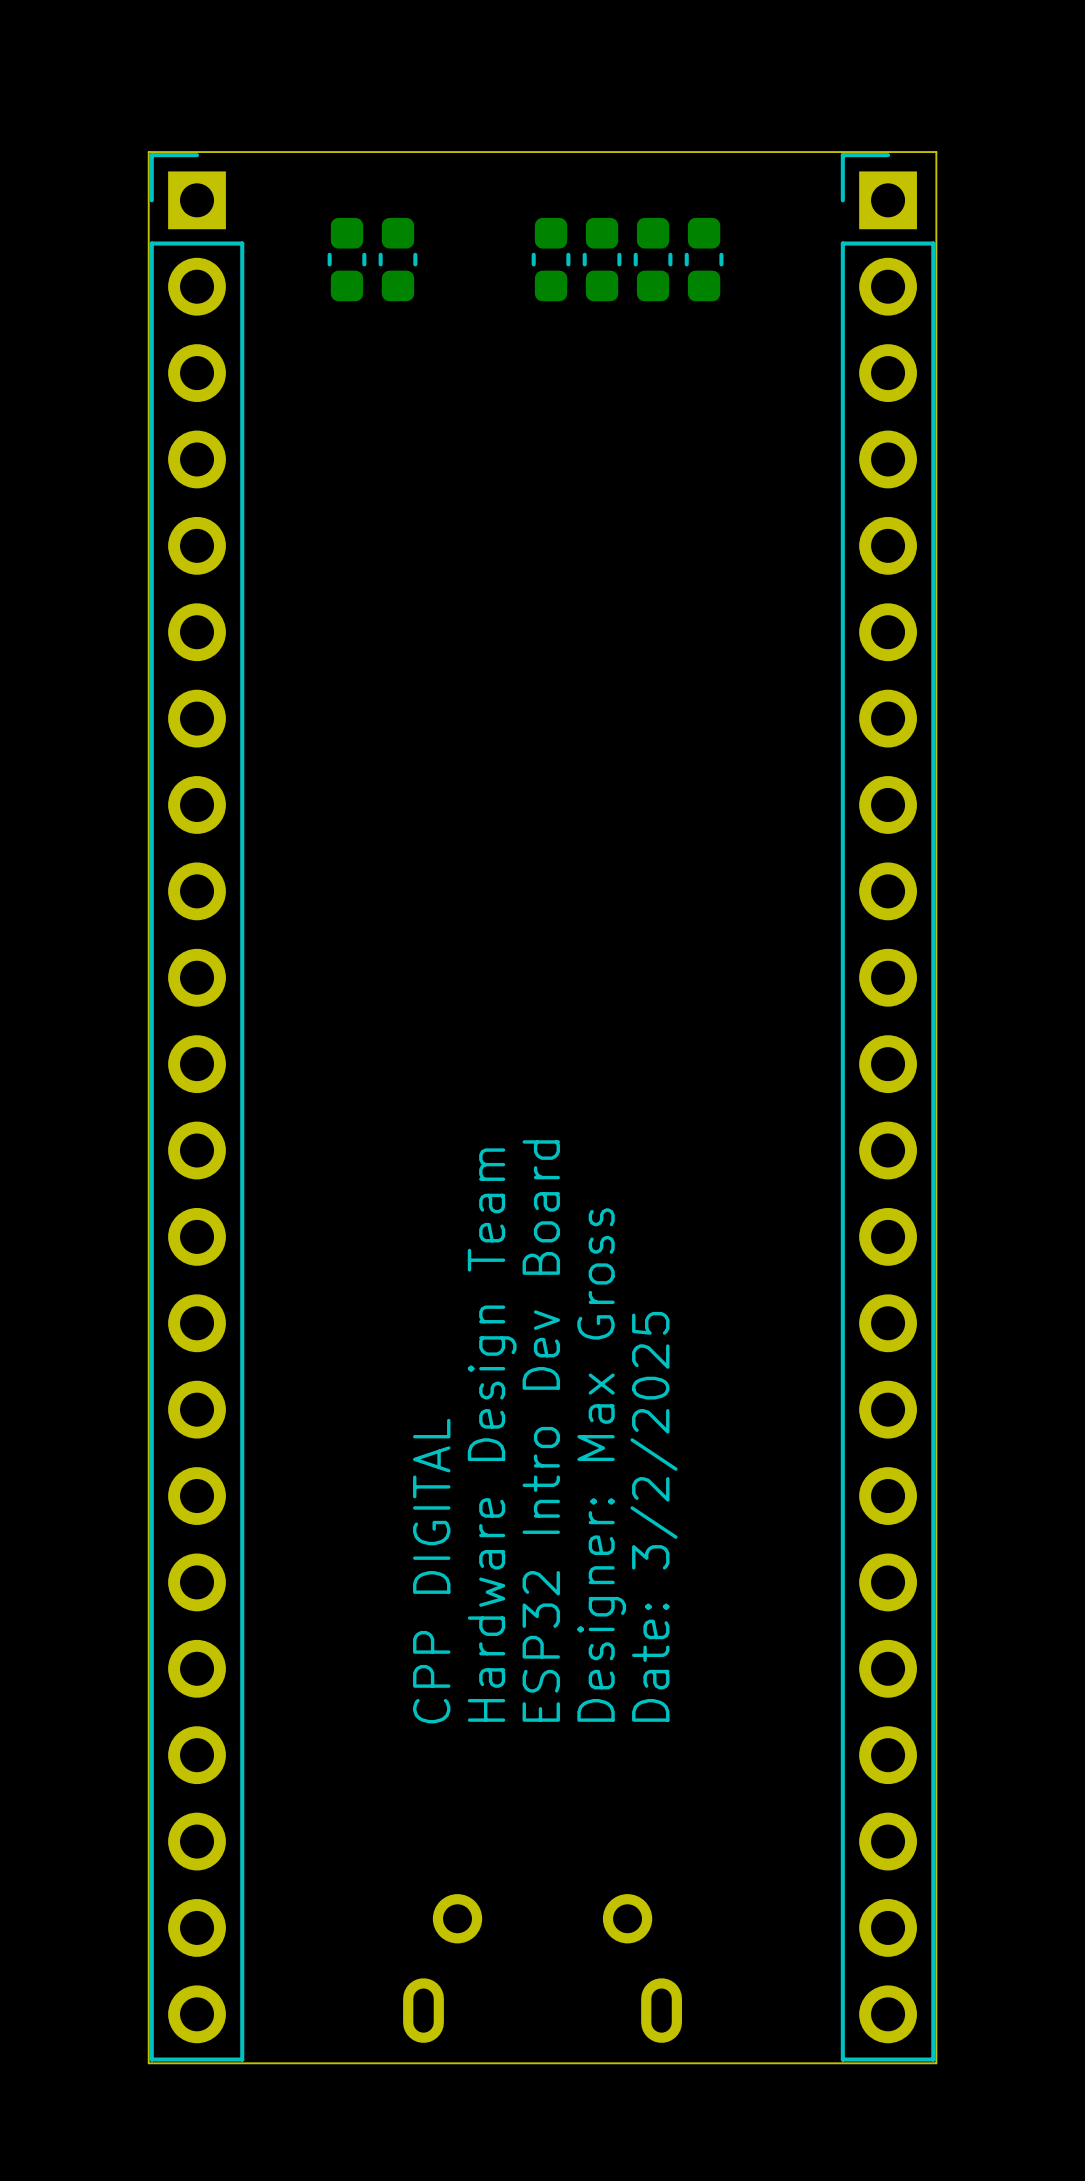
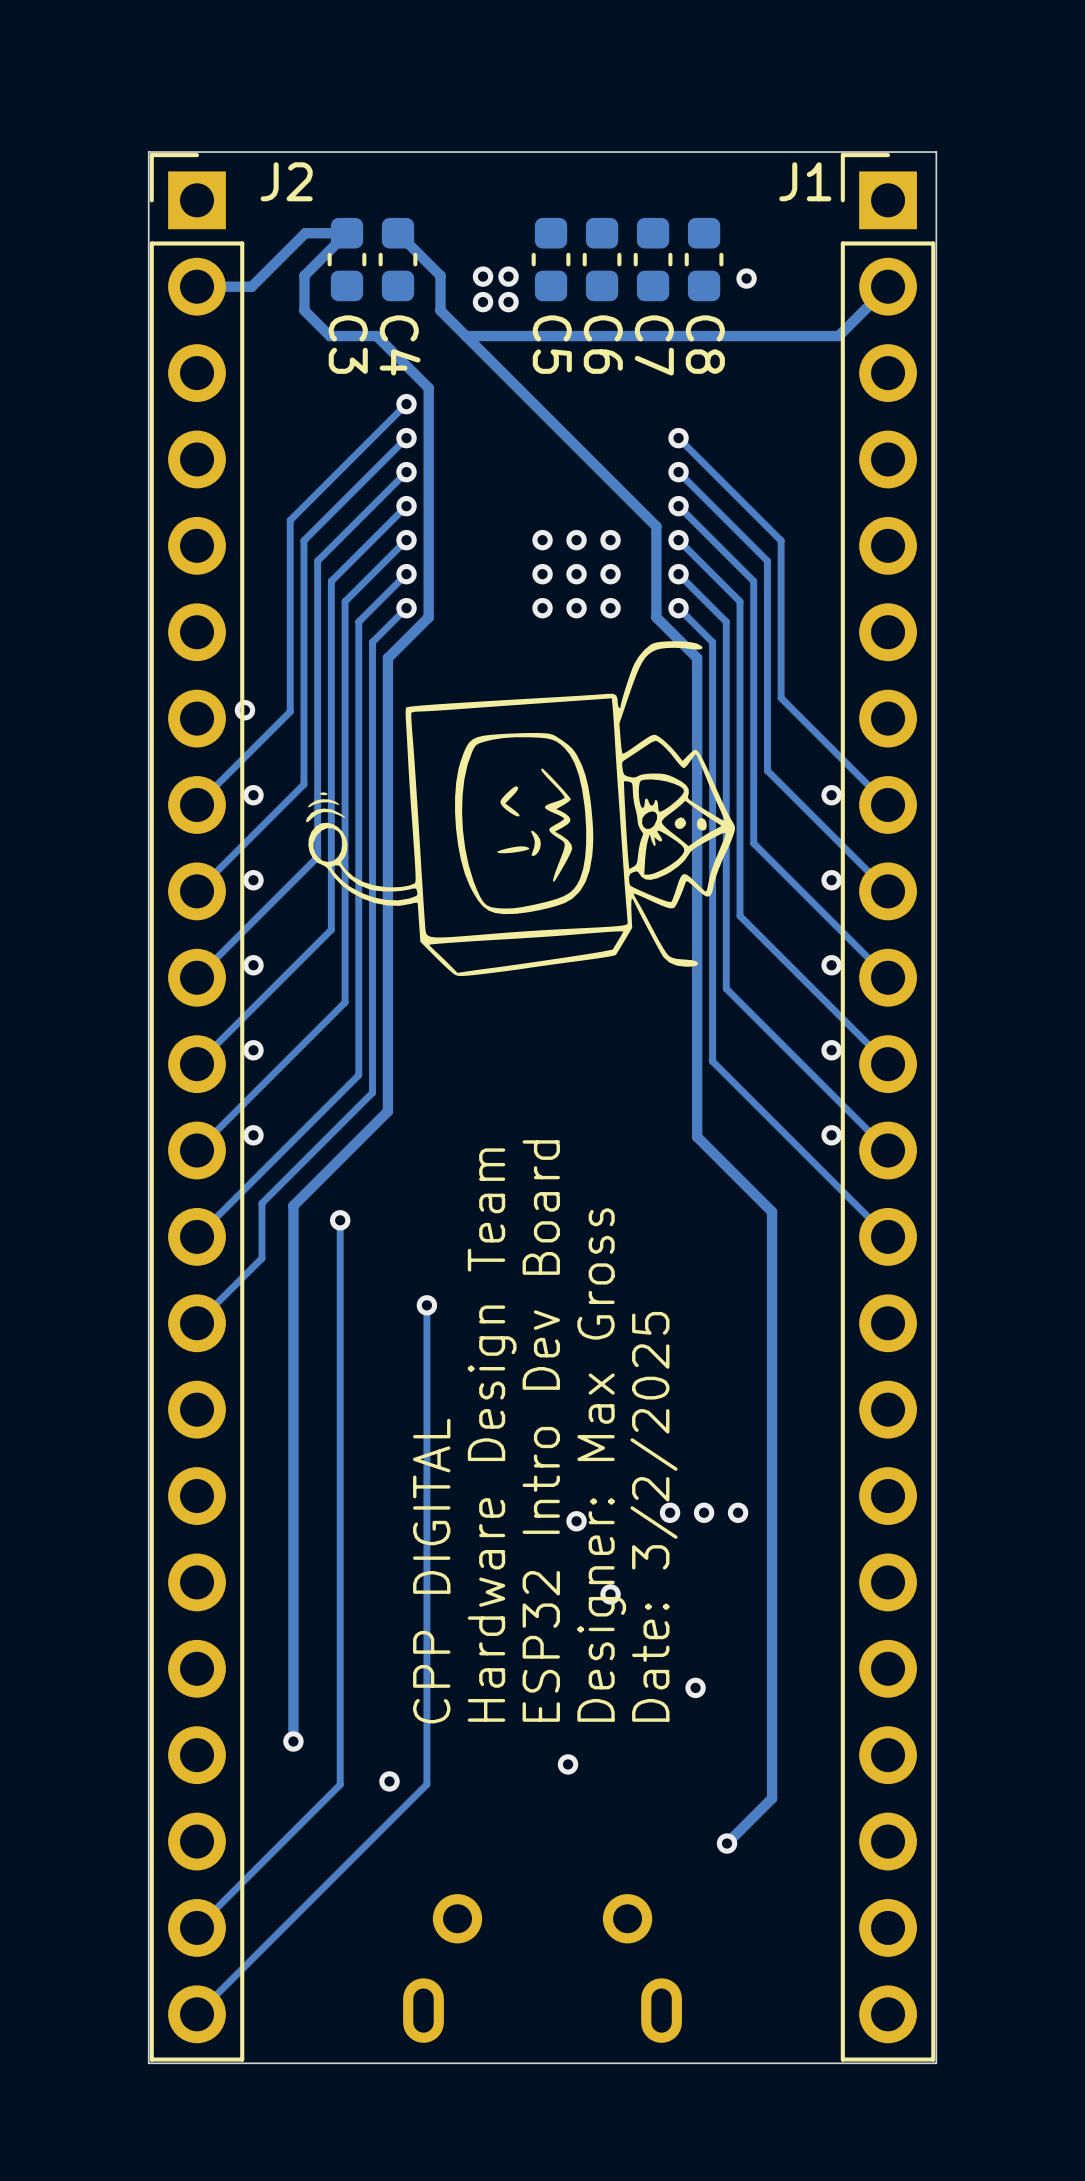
J2 name: none -> J2 (286, 181)
J1 name: none -> J1 (805, 181)
track: none -> (398, 233) (440, 275) (440, 310) (656, 526) (656, 617) (697, 658) (697, 1136) (772, 1211) (772, 1798) (727, 1843)
via: none -> (483, 276)
via: none -> (508, 276)
via: none -> (746, 278)
track: none -> (197, 286) (251, 286) (305, 233) (346, 233) (304, 275) (304, 310) (329, 336) (376, 336) (428, 388) (428, 617) (387, 658) (387, 1111) (293, 1205) (293, 1741)
track: none -> (888, 286) (838, 336) (466, 336)
via: none -> (483, 302)
via: none -> (508, 302)
C3 name: none -> C3 (348, 344)
C5 name: none -> C5 (552, 344)
C6 name: none -> C6 (603, 344)
C8 name: none -> C8 (705, 344)
C4 name: none -> C4 (400, 345)
C7 name: none -> C7 (654, 345)
track: none -> (406, 404) (290, 520) (290, 711) (197, 804)
via: none -> (406, 404)
track: none -> (406, 438) (303, 540) (303, 784) (197, 891)
via: none -> (406, 438)
track: none -> (678, 438) (781, 540) (781, 698) (888, 804)
via: none -> (678, 438)
track: none -> (406, 472) (317, 560) (317, 857) (197, 977)
via: none -> (406, 472)
track: none -> (678, 472) (767, 560) (767, 770) (888, 891)
via: none -> (678, 472)
track: none -> (406, 506) (331, 581) (331, 929) (197, 1064)
via: none -> (406, 506)
track: none -> (678, 506) (753, 581) (753, 843) (888, 977)
via: none -> (678, 506)
track: none -> (406, 540) (345, 601) (345, 1002) (197, 1150)
via: none -> (406, 540)
via: none -> (542, 540)
via: none -> (576, 540)
via: none -> (610, 540)
track: none -> (678, 540) (740, 601) (740, 916) (888, 1064)
via: none -> (678, 540)
track: none -> (406, 574) (358, 621) (358, 1075) (197, 1236)
via: none -> (406, 574)
via: none -> (542, 574)
via: none -> (576, 574)
via: none -> (610, 574)
track: none -> (678, 574) (726, 621) (726, 988) (888, 1150)
via: none -> (678, 574)
track: none -> (406, 608) (372, 642) (372, 1092) (261, 1203) (261, 1258) (197, 1323)
via: none -> (406, 608)
via: none -> (542, 608)
via: none -> (576, 608)
via: none -> (610, 608)
track: none -> (678, 608) (712, 642) (712, 1061) (888, 1236)
via: none -> (678, 608)
drawing: none -> [305, 641, 735, 976]
via: none -> (244, 710)
via: none -> (253, 795)
via: none -> (831, 795)
via: none -> (253, 880)
via: none -> (831, 880)
via: none -> (253, 965)
via: none -> (831, 965)
via: none -> (253, 1050)
via: none -> (831, 1050)
via: none -> (253, 1135)
via: none -> (831, 1135)
track: none -> (340, 1220) (340, 1784) (197, 1927)
via: none -> (340, 1220)
track: none -> (426, 1305) (426, 1784) (197, 2014)
via: none -> (426, 1305)
via: none -> (670, 1512)
via: none -> (704, 1512)
via: none -> (738, 1512)
via: none -> (576, 1521)
via: none -> (610, 1594)
via: none -> (695, 1687)
via: none -> (293, 1741)
via: none -> (568, 1764)
via: none -> (389, 1781)
via: none -> (727, 1843)

